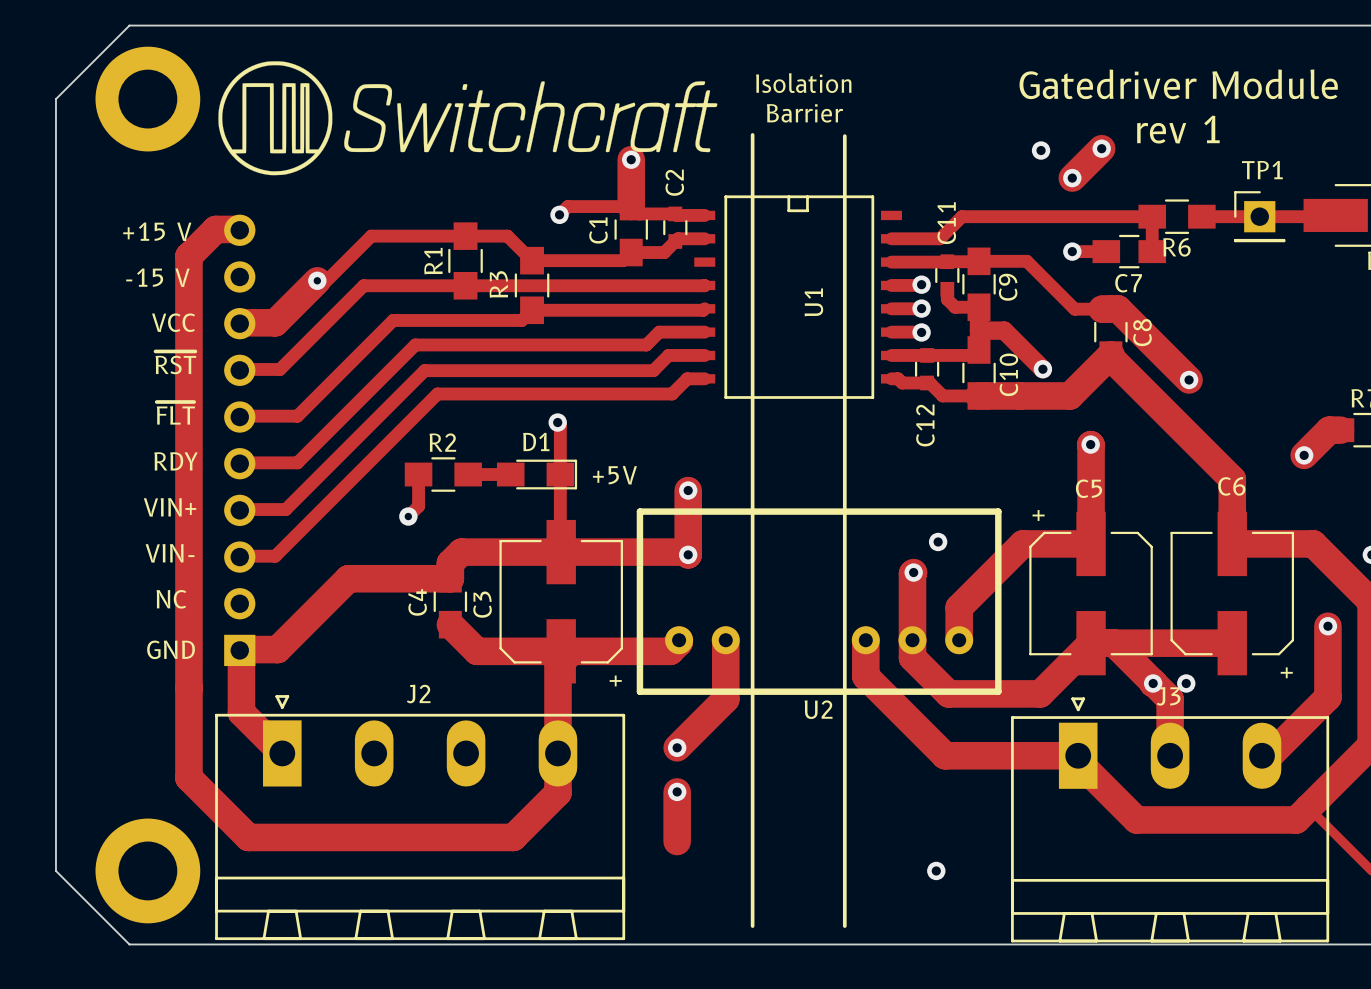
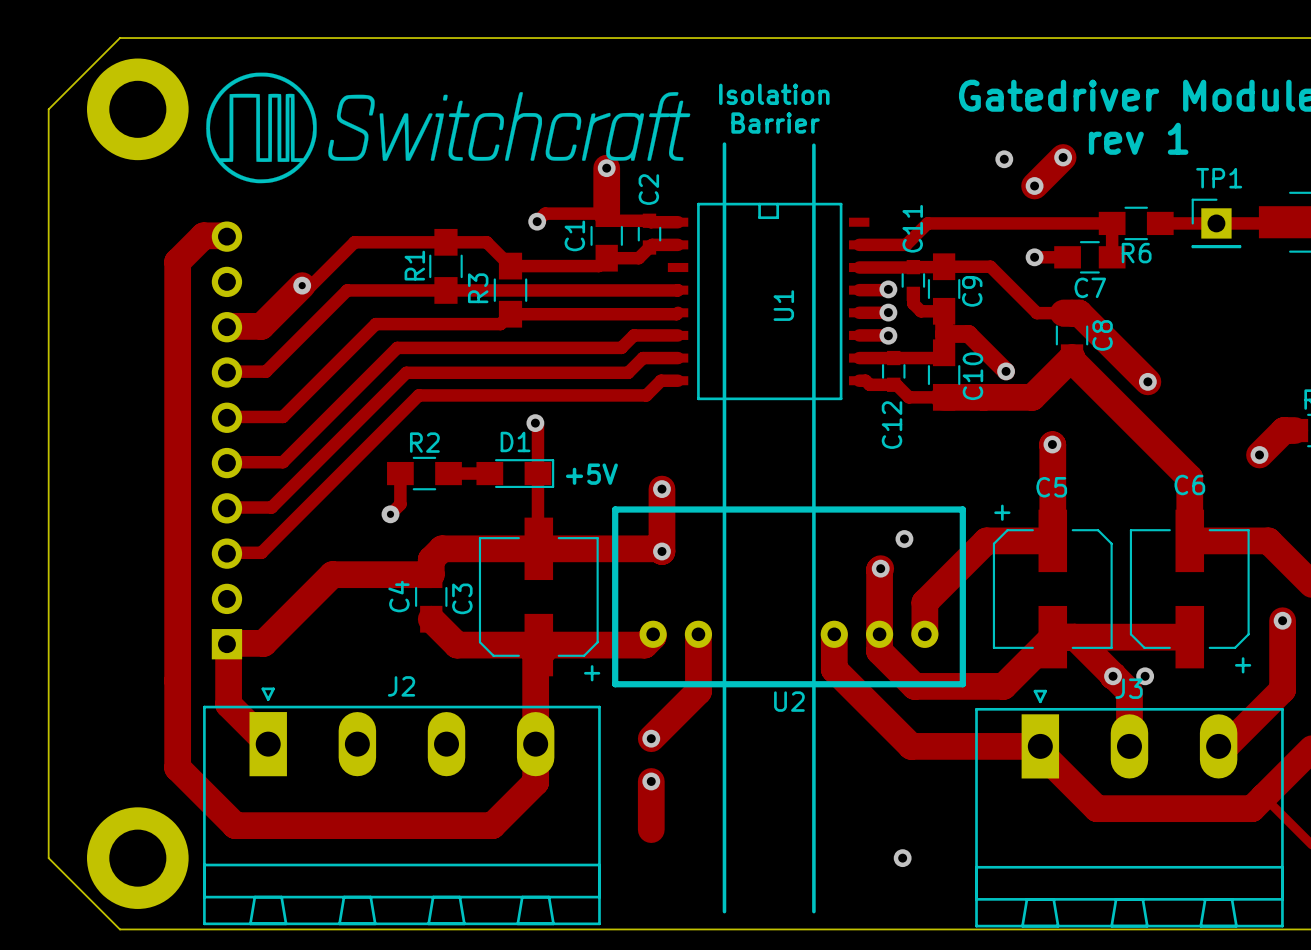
text: +15 V (157, 231) -> none
text: -15 V (157, 277) -> none
text: VCC (173, 322) -> none
text: ~{RST} (175, 362) -> none
text: ~{FLT} (175, 413) -> none
text: RDY (176, 461) -> none
text: VIN+ (170, 507) -> none
text: VIN- (170, 553) -> none
text: NC (171, 599) -> none
text: GND (171, 649) -> none

